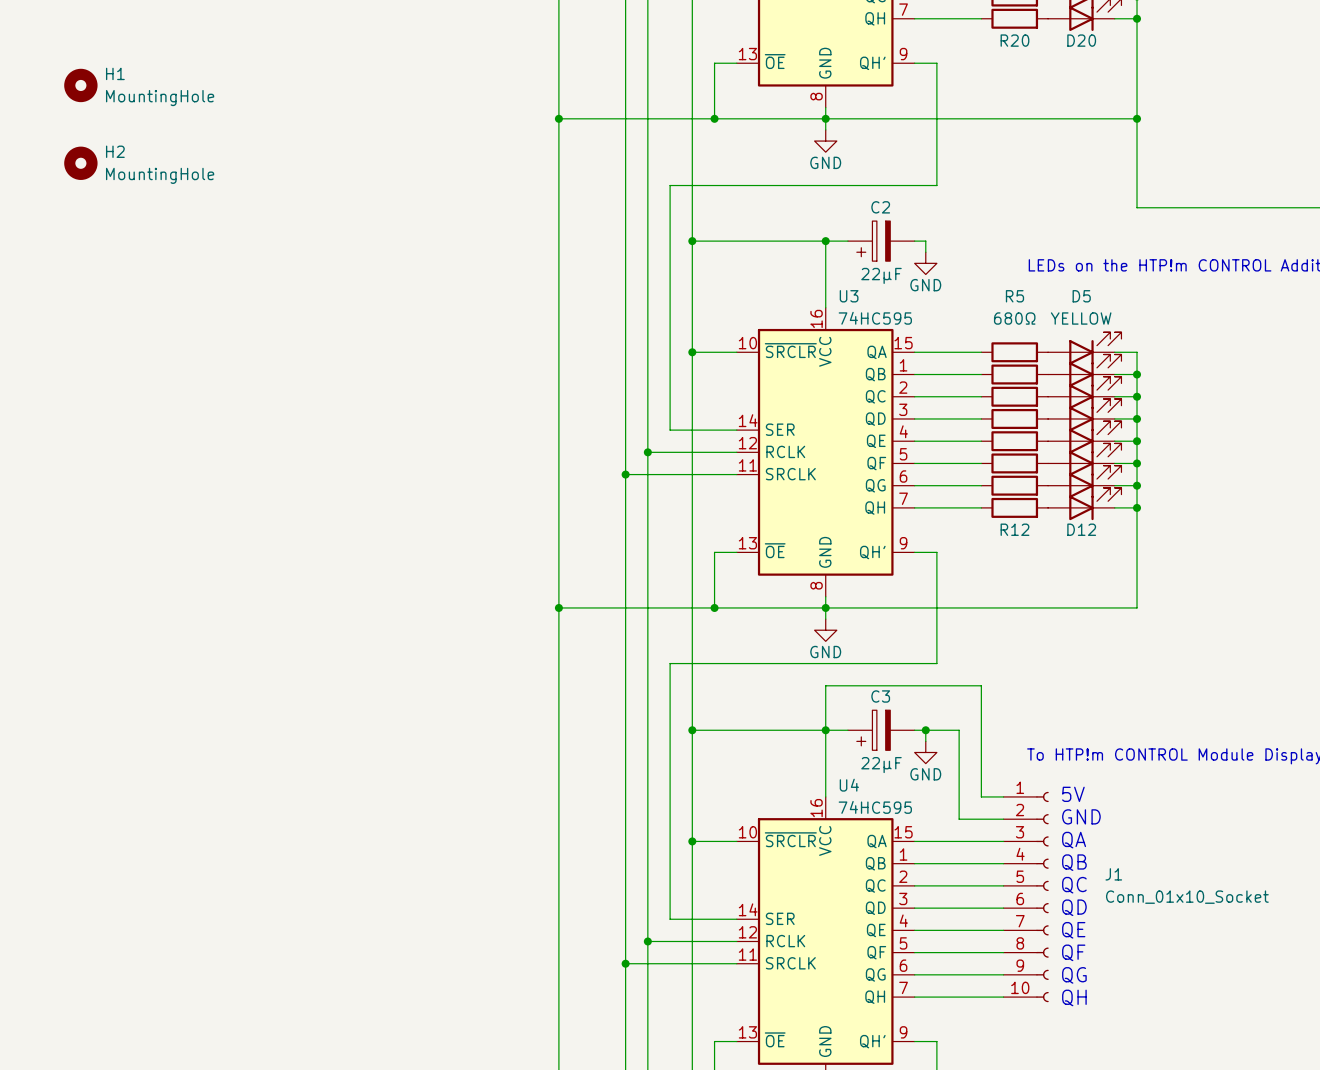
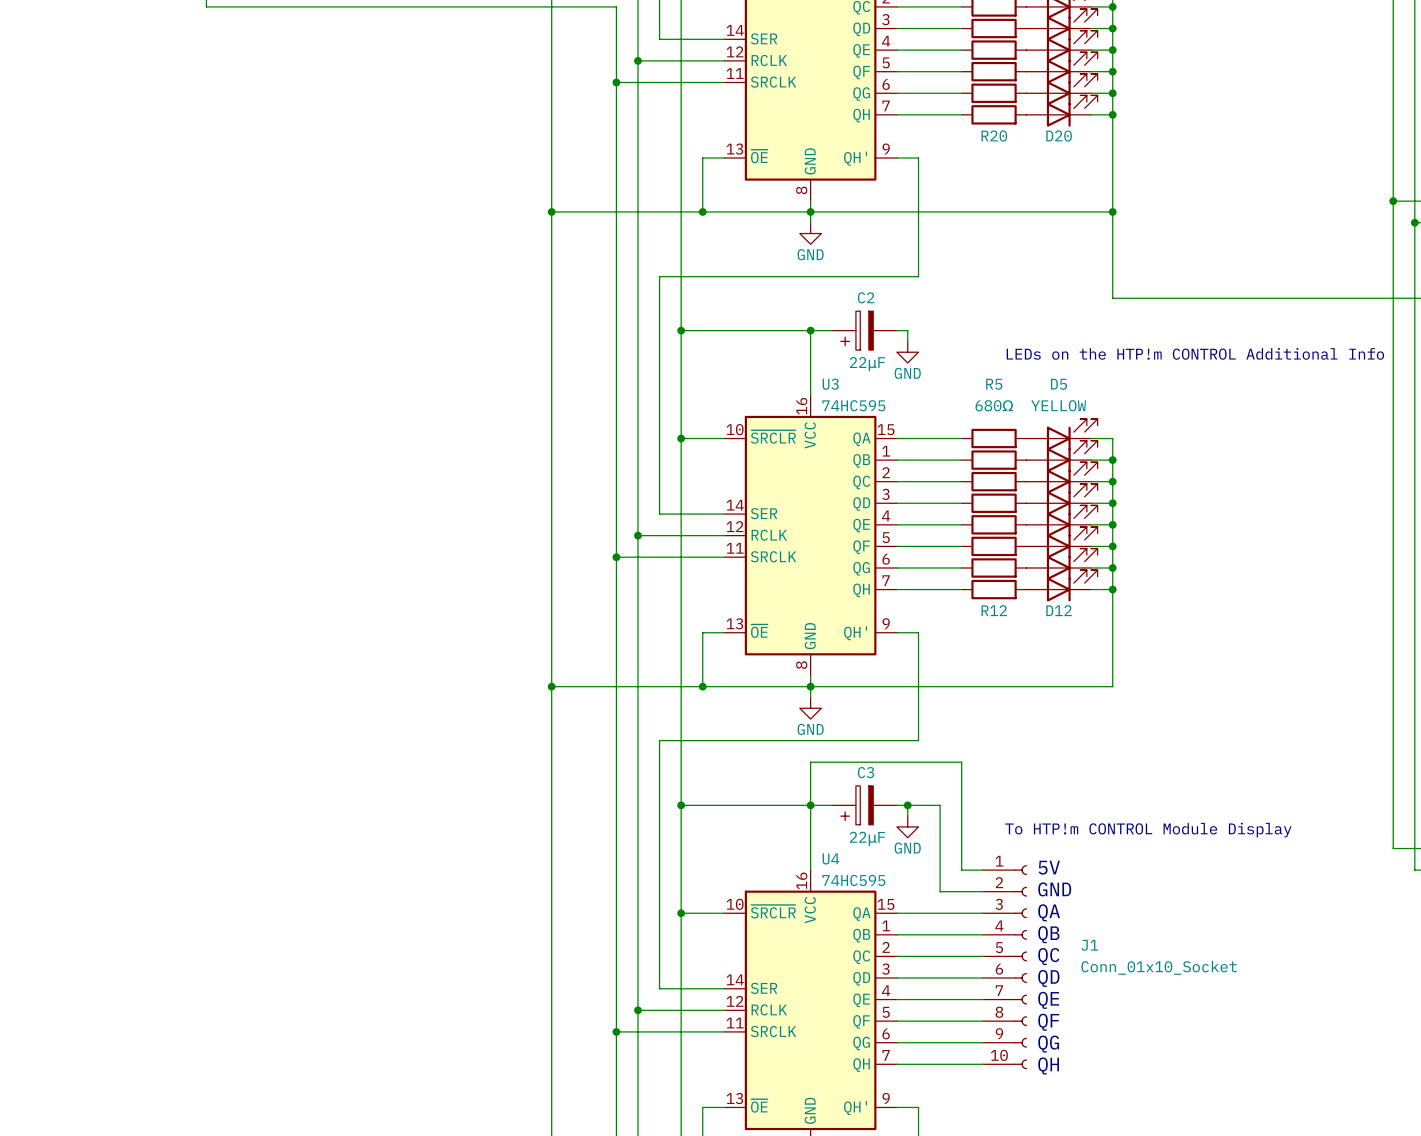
H1: MountingHole (80, 85) -> none
H2: MountingHole (80, 163) -> none

